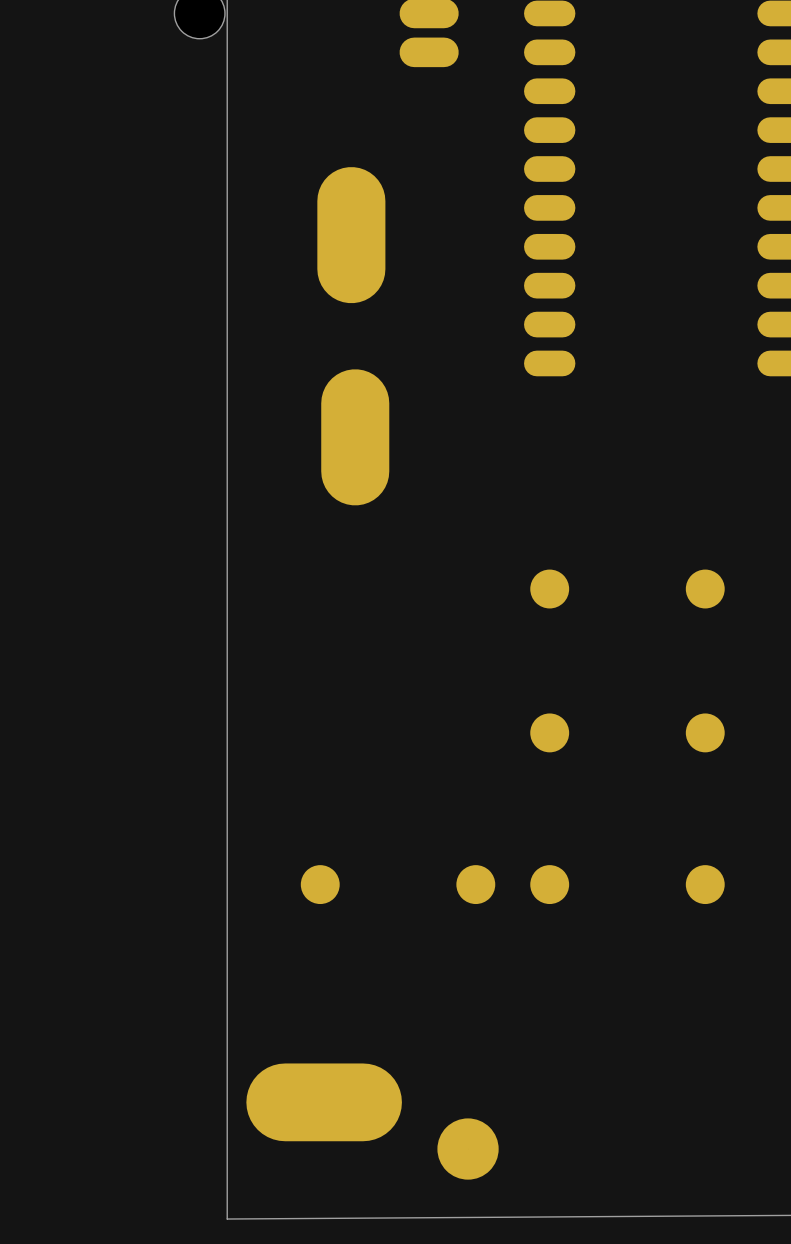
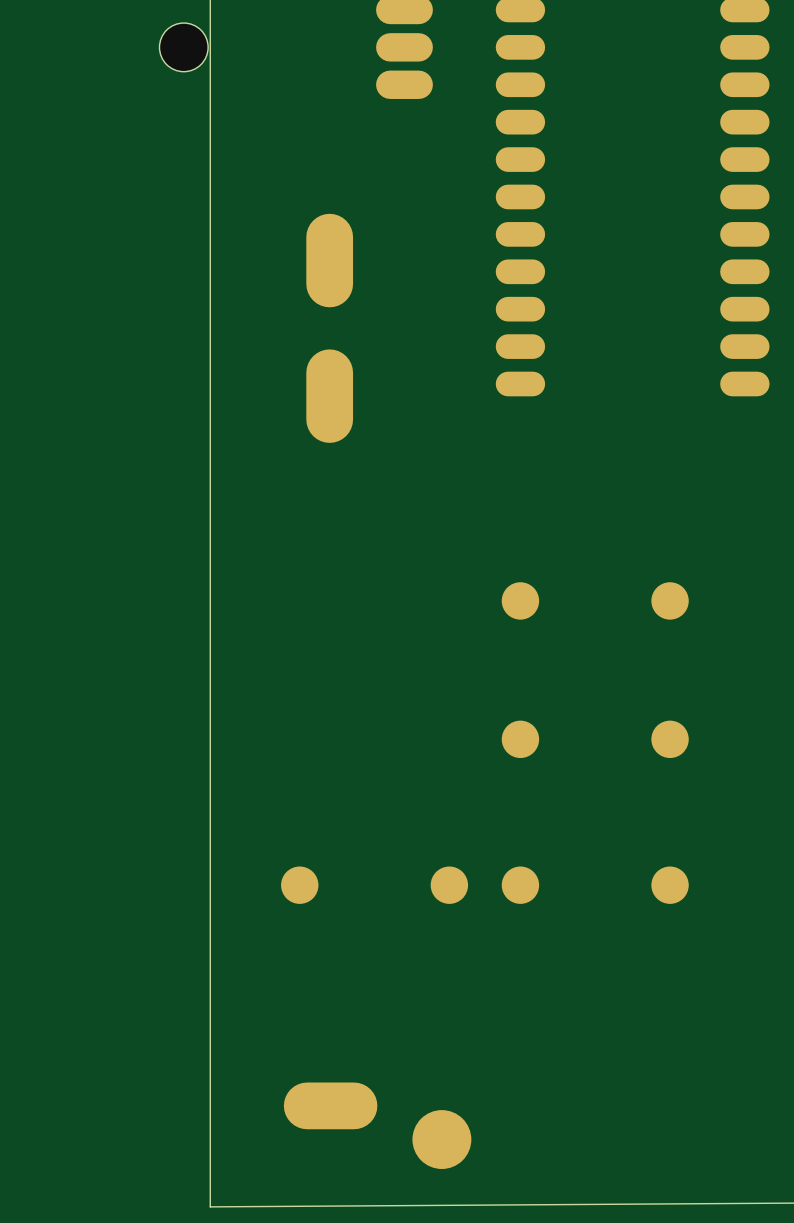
part footprint: [317, 167, 386, 304] -> [306, 213, 354, 308]
part: none -> (329, 396)
part: (355, 437) -> none
part: (324, 1102) -> none
part: none -> (330, 1105)

